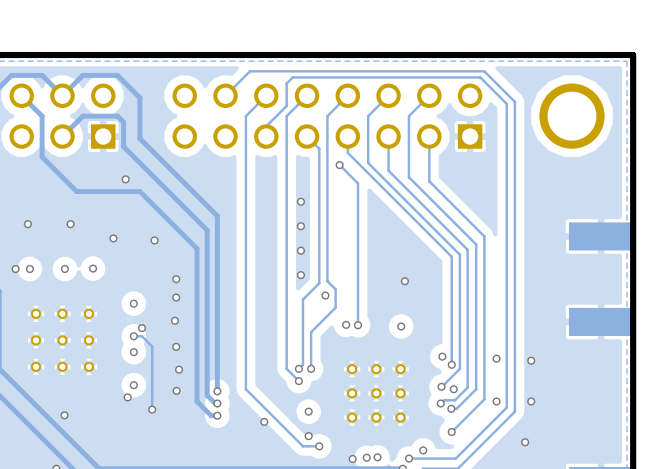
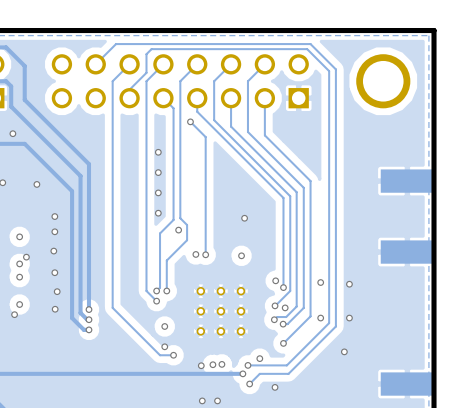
track: (133, 336) (141, 336) (152, 346) (152, 409) -> none
via: (152, 409) -> none
via: (264, 421) -> none

